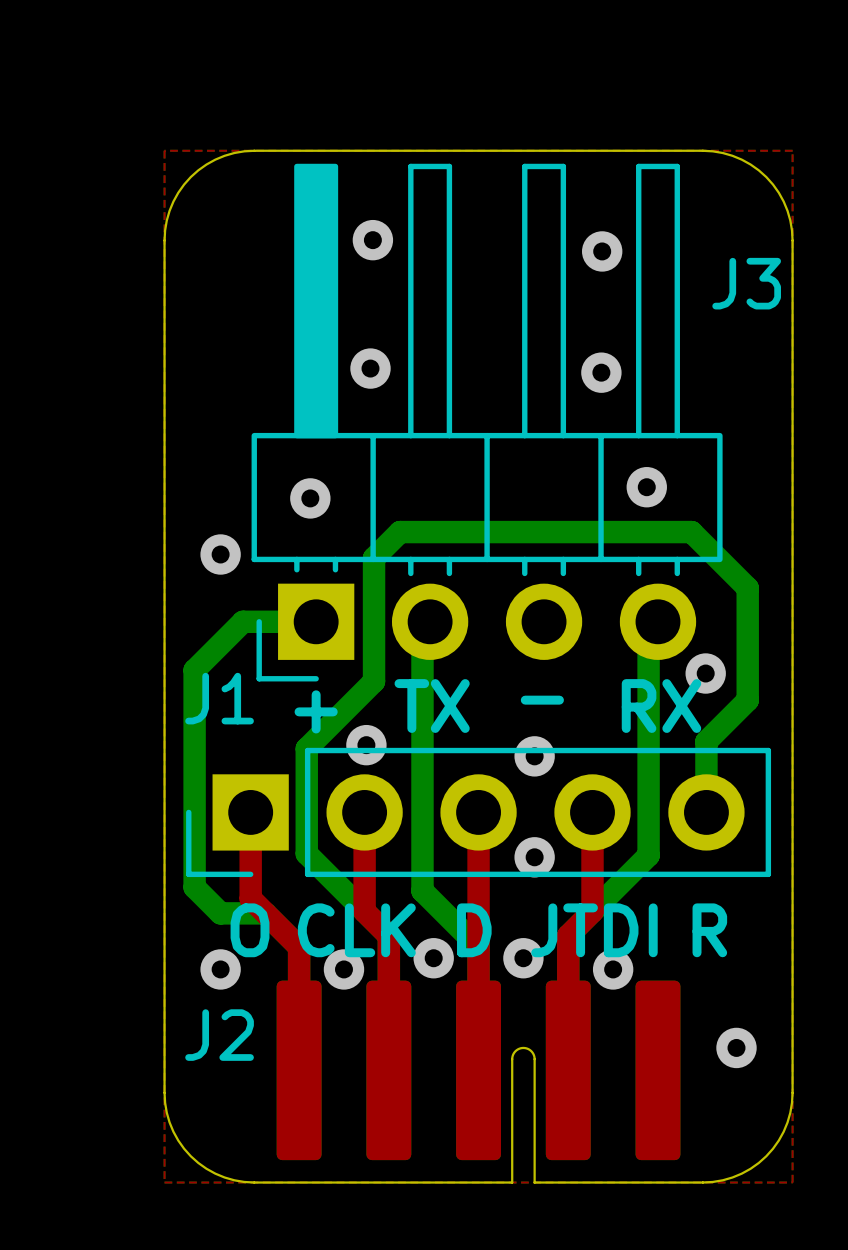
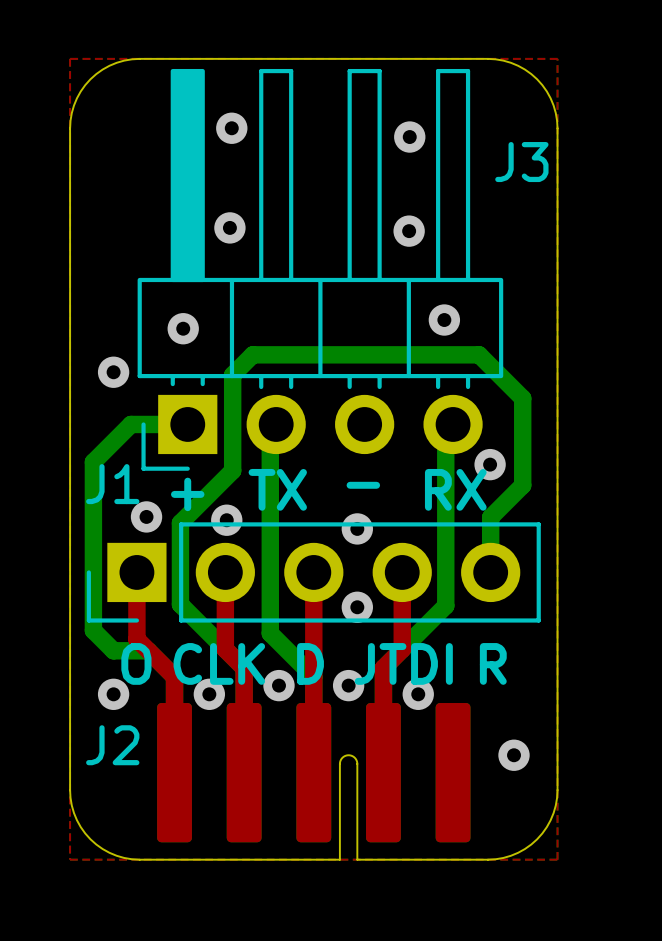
via: none -> (146, 516)

